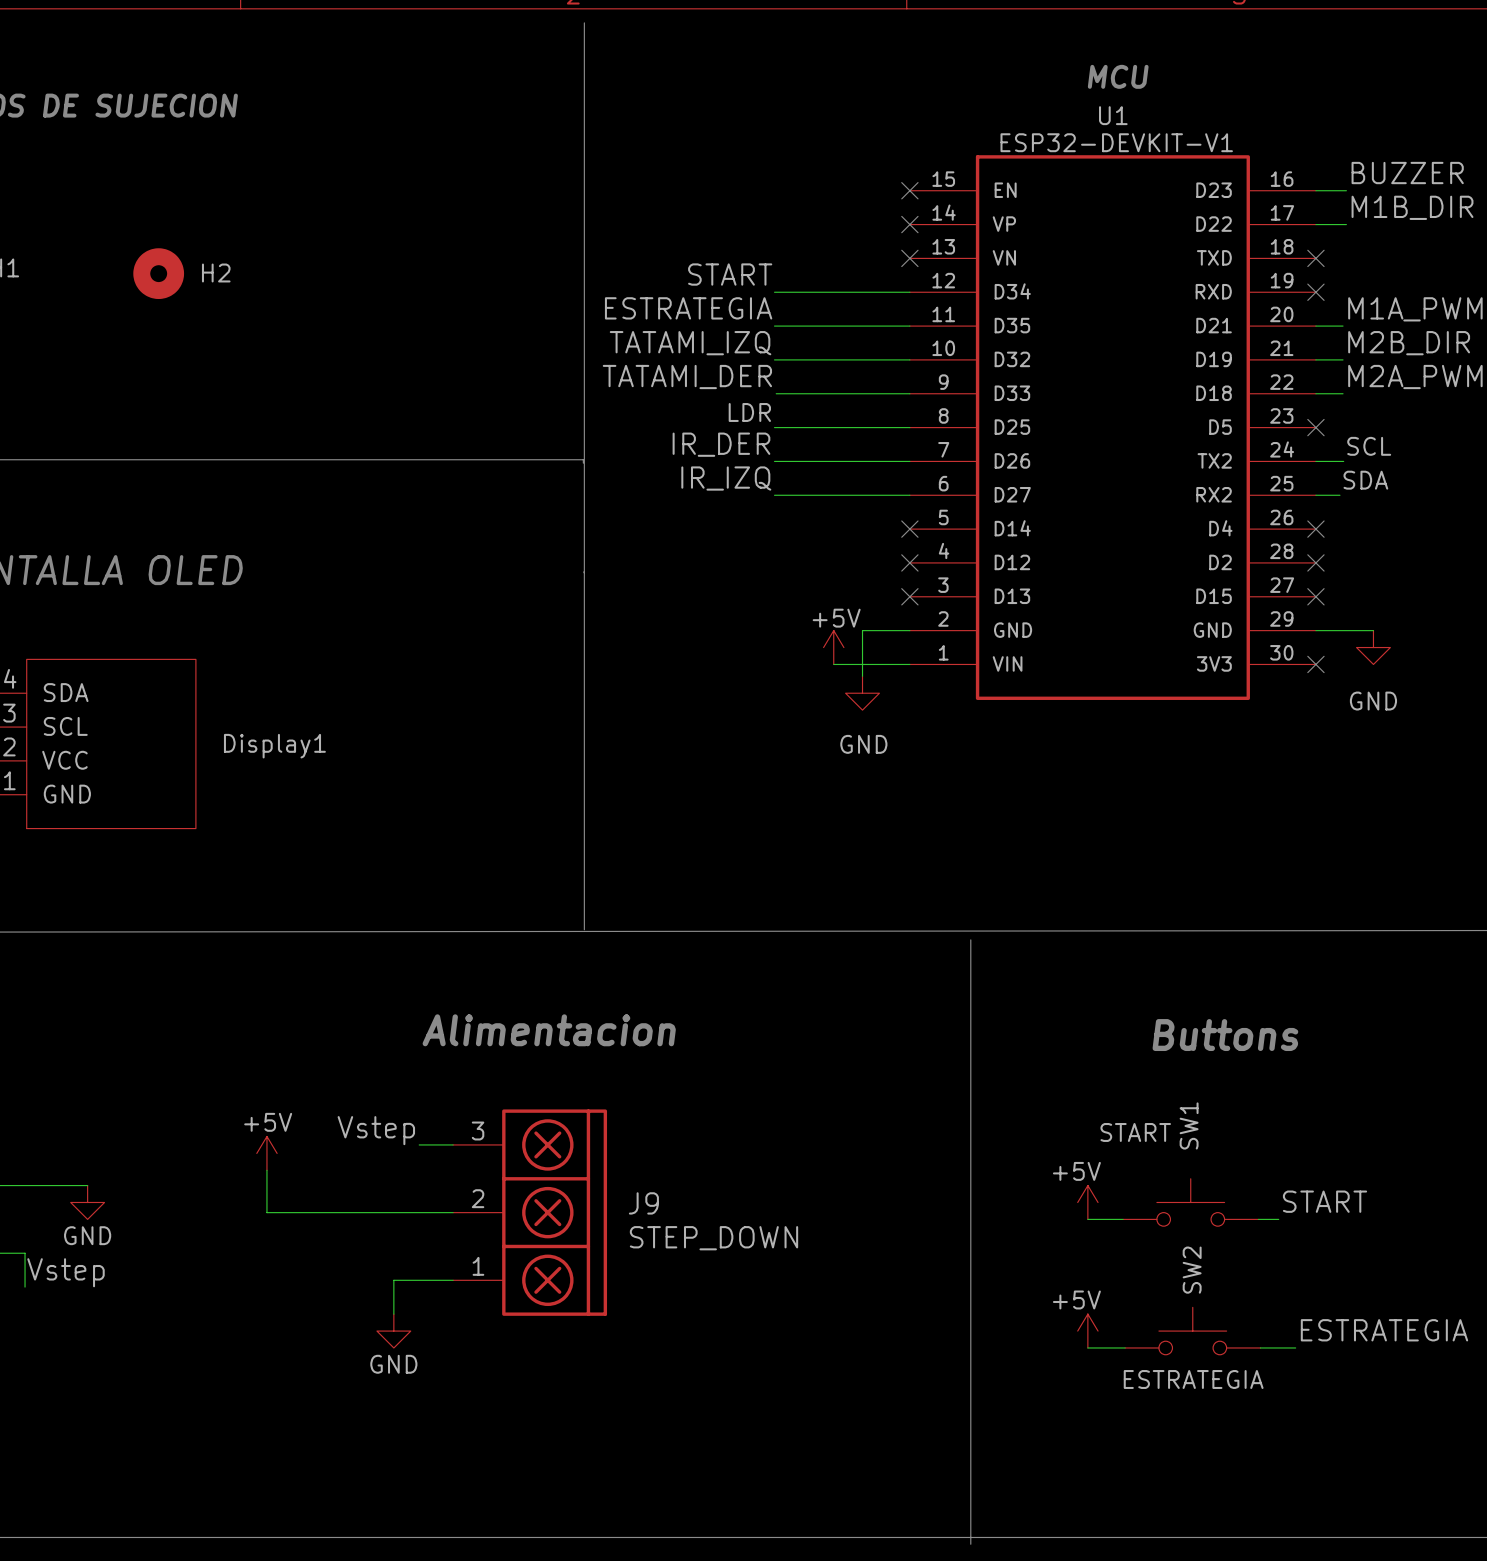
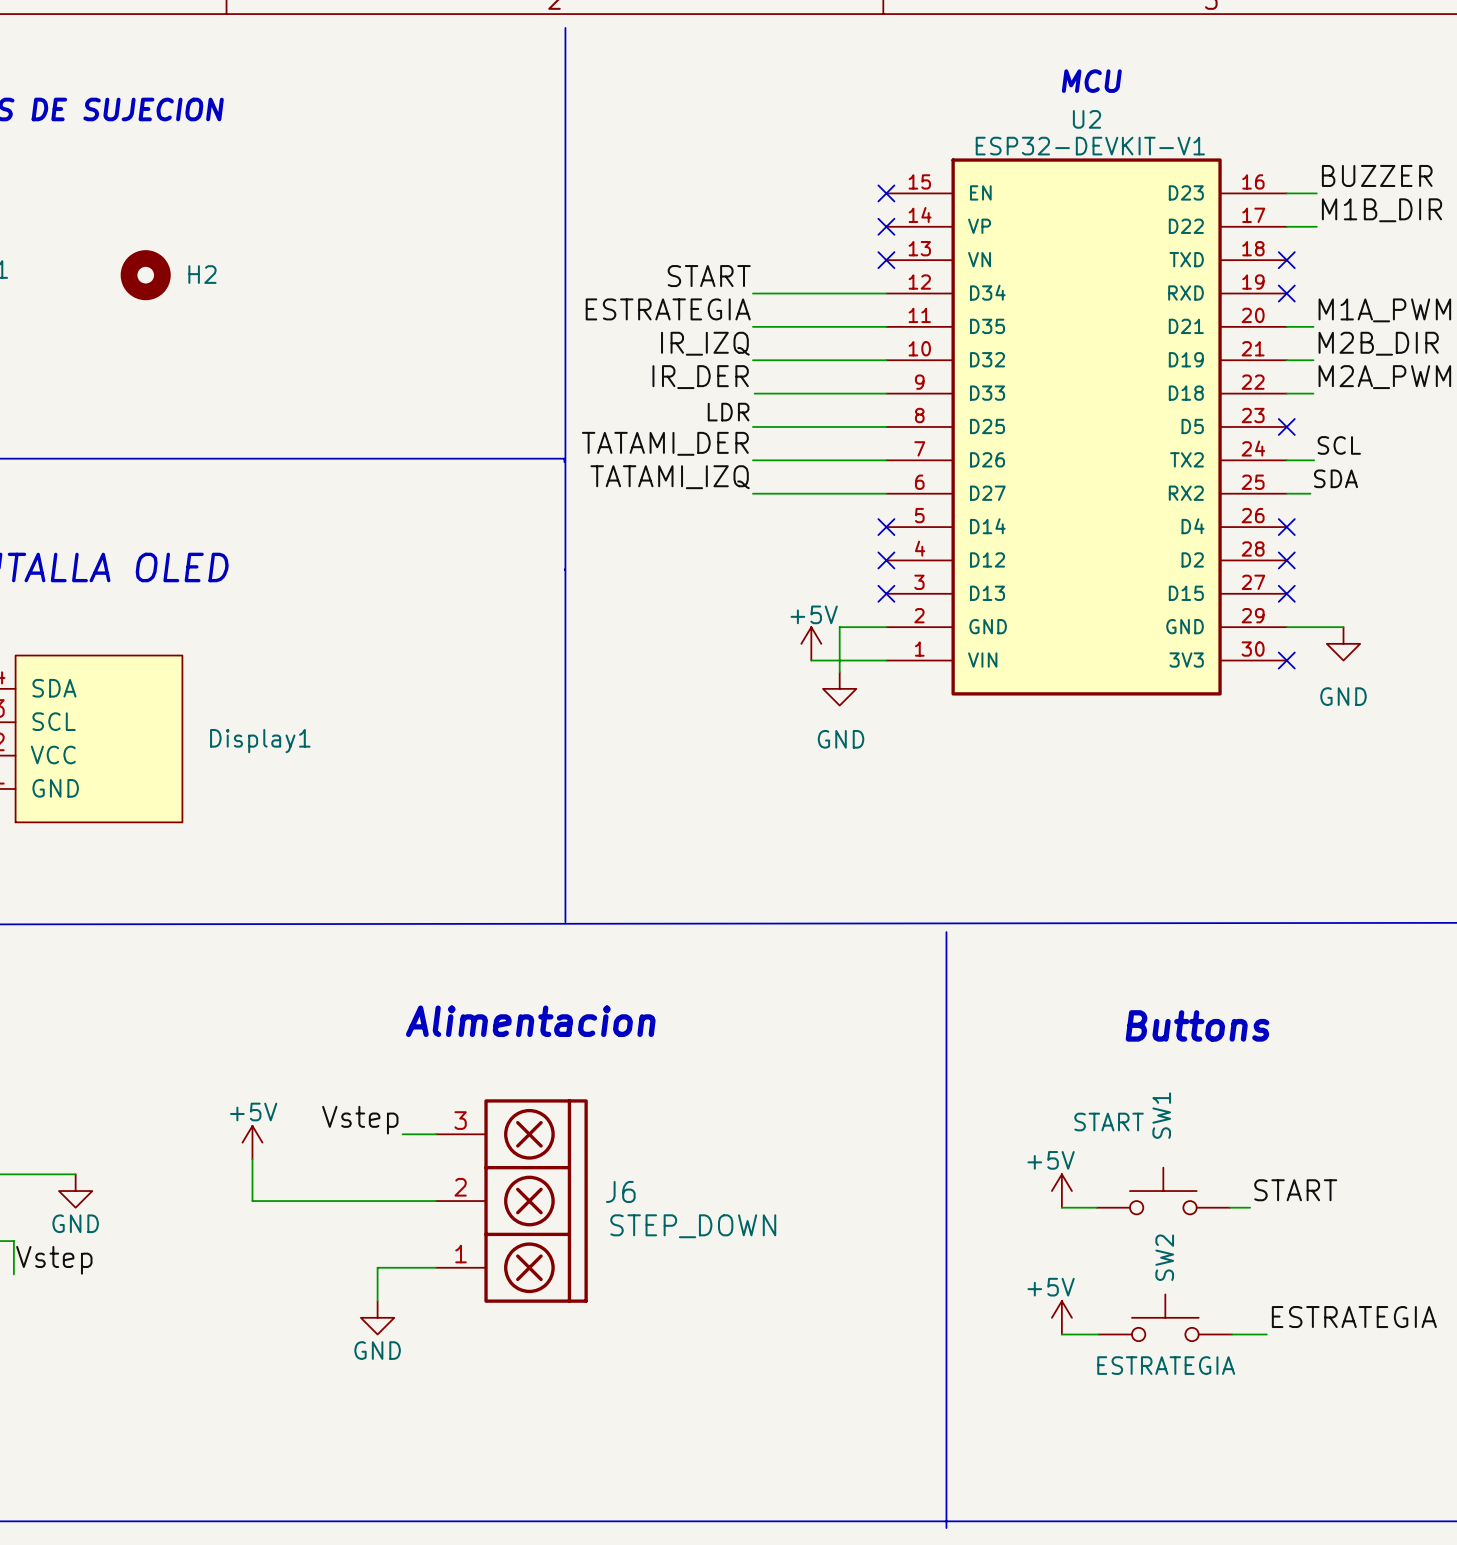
U1 name: U1 (1113, 115) -> U2 (1086, 119)
label: TATAMI_IZQ (690, 343) -> IR_IZQ (705, 343)
label: TATAMI_DER (687, 377) -> IR_DER (700, 377)
label: IR_DER (721, 444) -> TATAMI_DER (665, 443)
label: IR_IZQ (726, 478) -> TATAMI_IZQ (670, 477)
J9 name: J9 (643, 1203) -> J6 (620, 1191)

